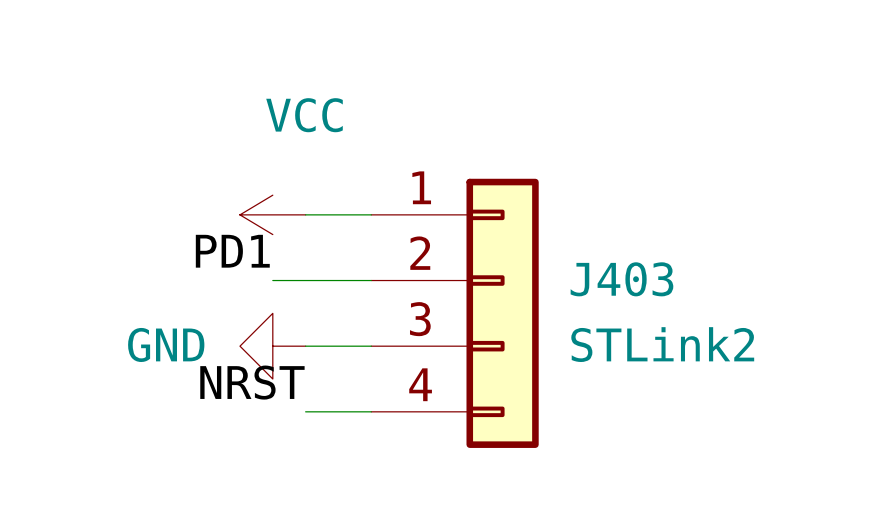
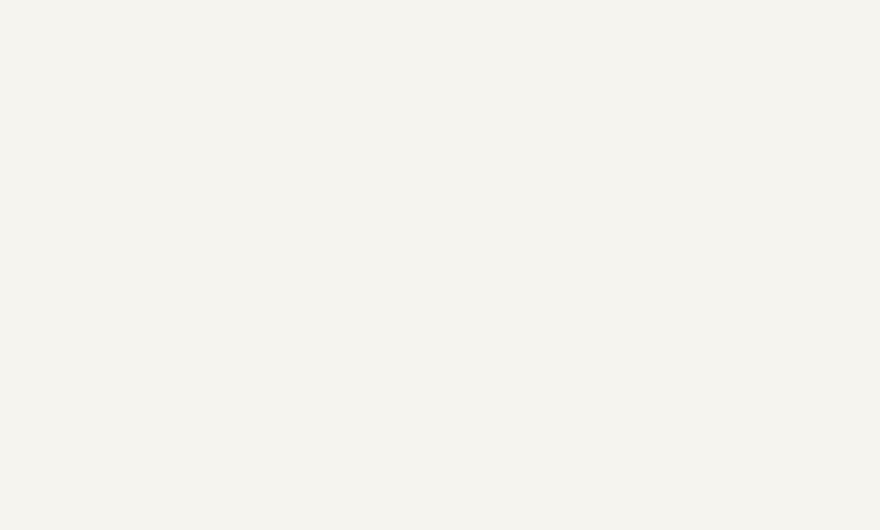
power symbol: VCC (272, 214) -> none
wire: (305, 214) (371, 214) -> none
label: PD1 (232, 251) -> none
wire: (272, 280) (371, 280) -> none
J403: STLink2 (455, 313) -> none
power symbol: GND (272, 346) -> none
wire: (305, 346) (371, 346) -> none
label: NRST (252, 382) -> none
wire: (305, 411) (371, 411) -> none

